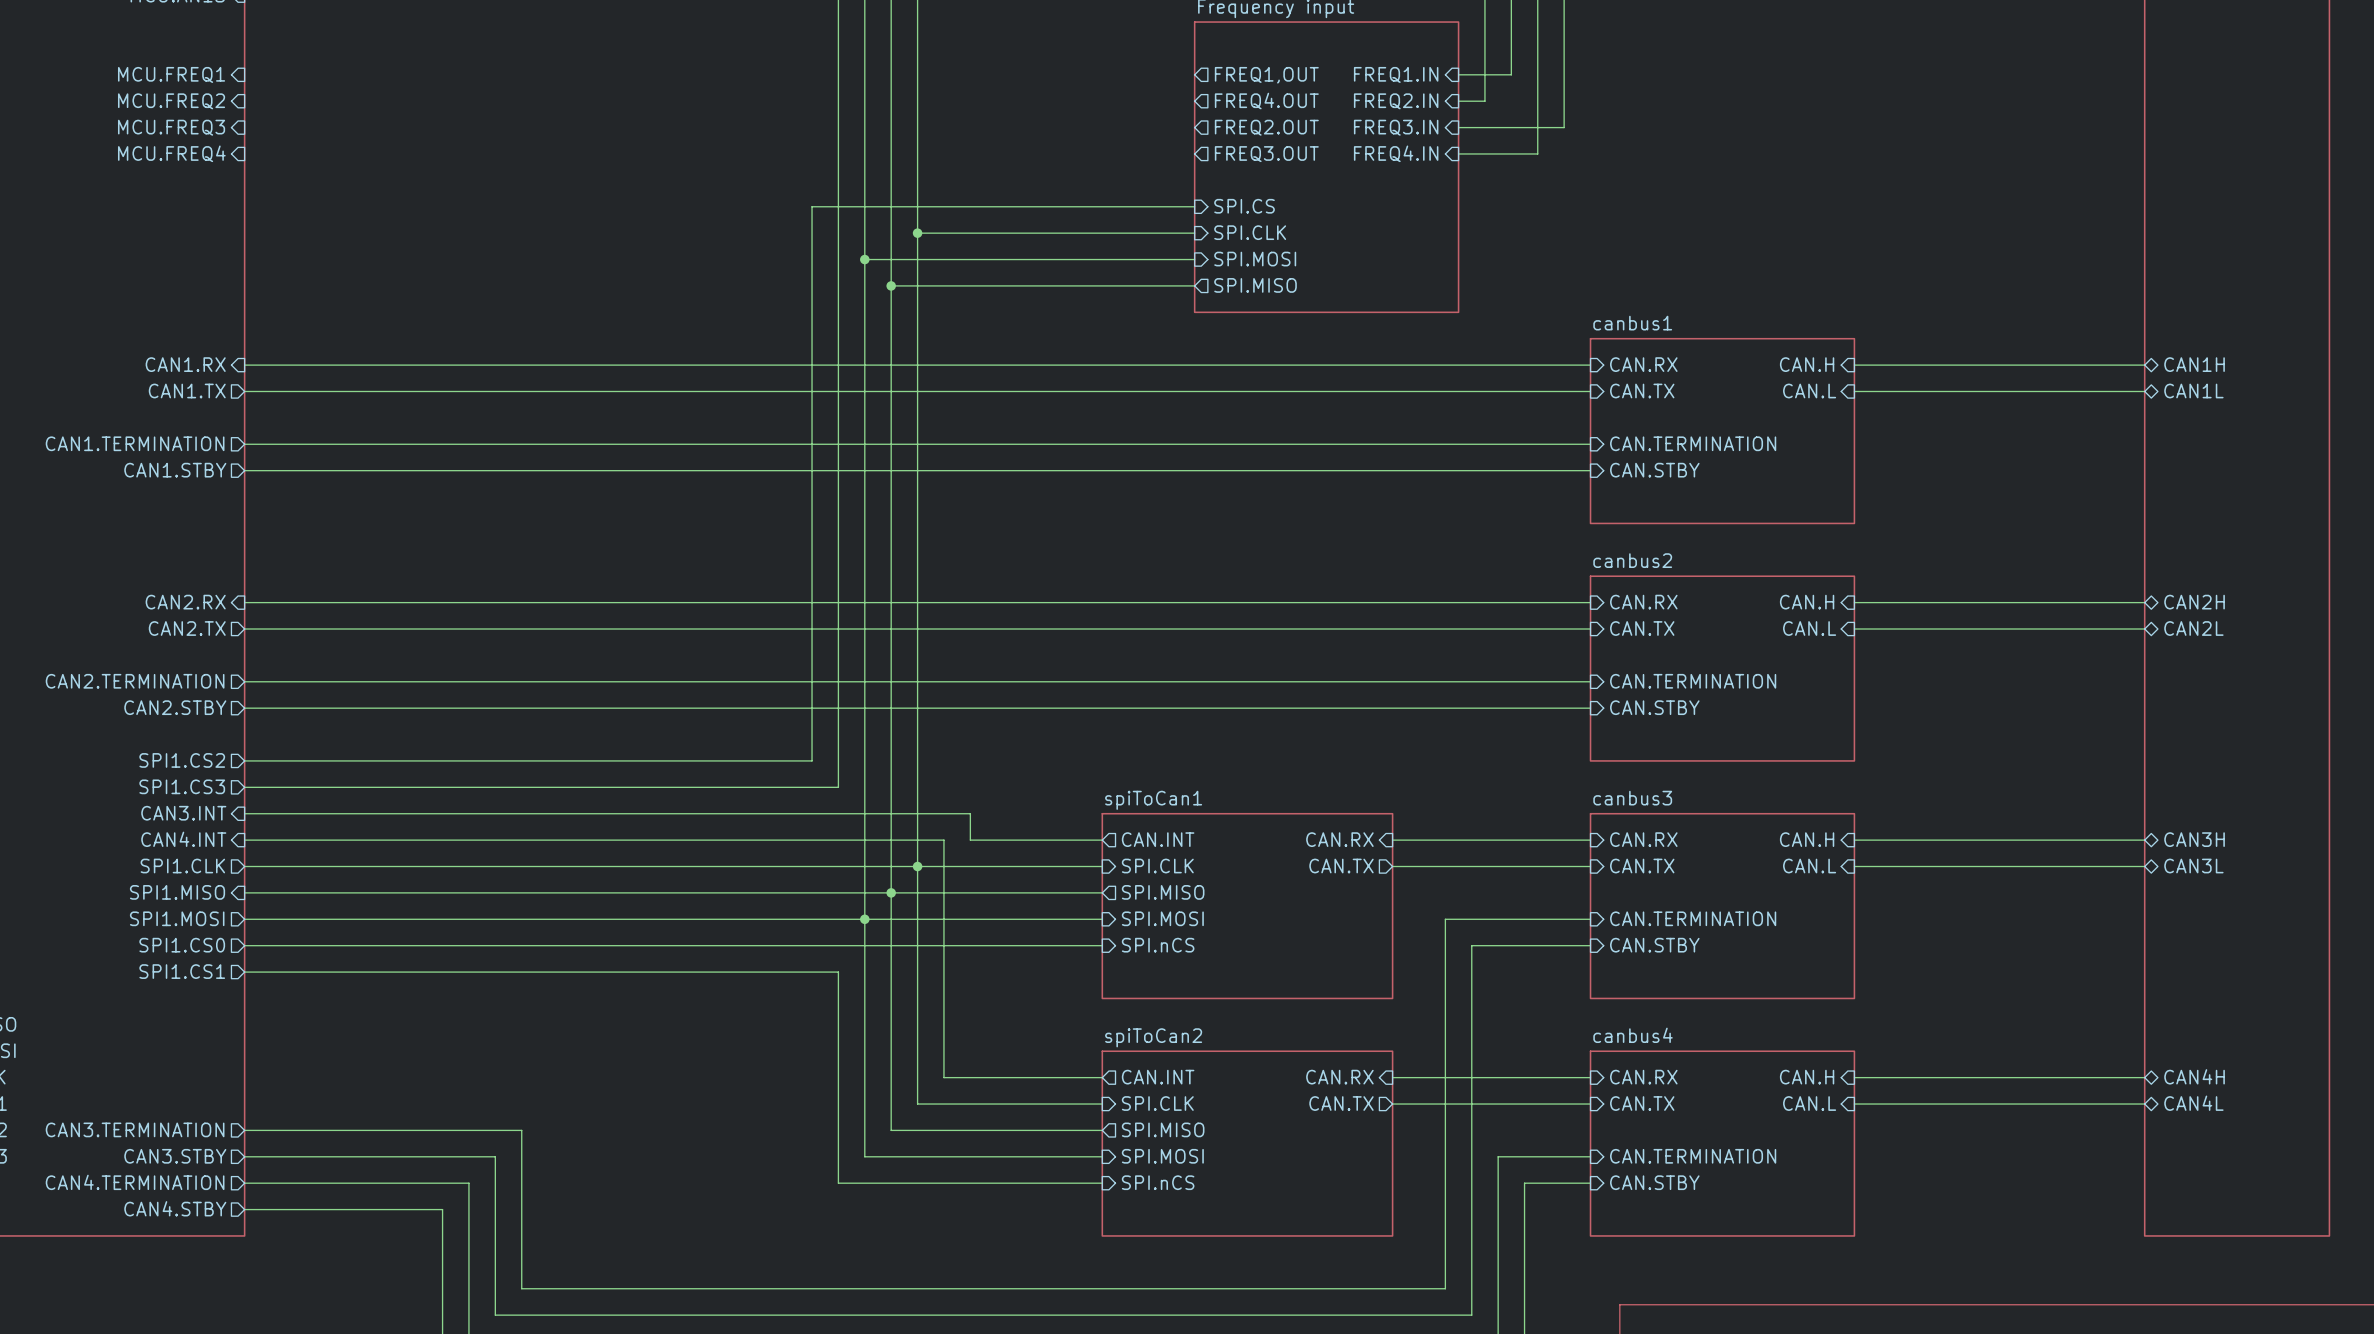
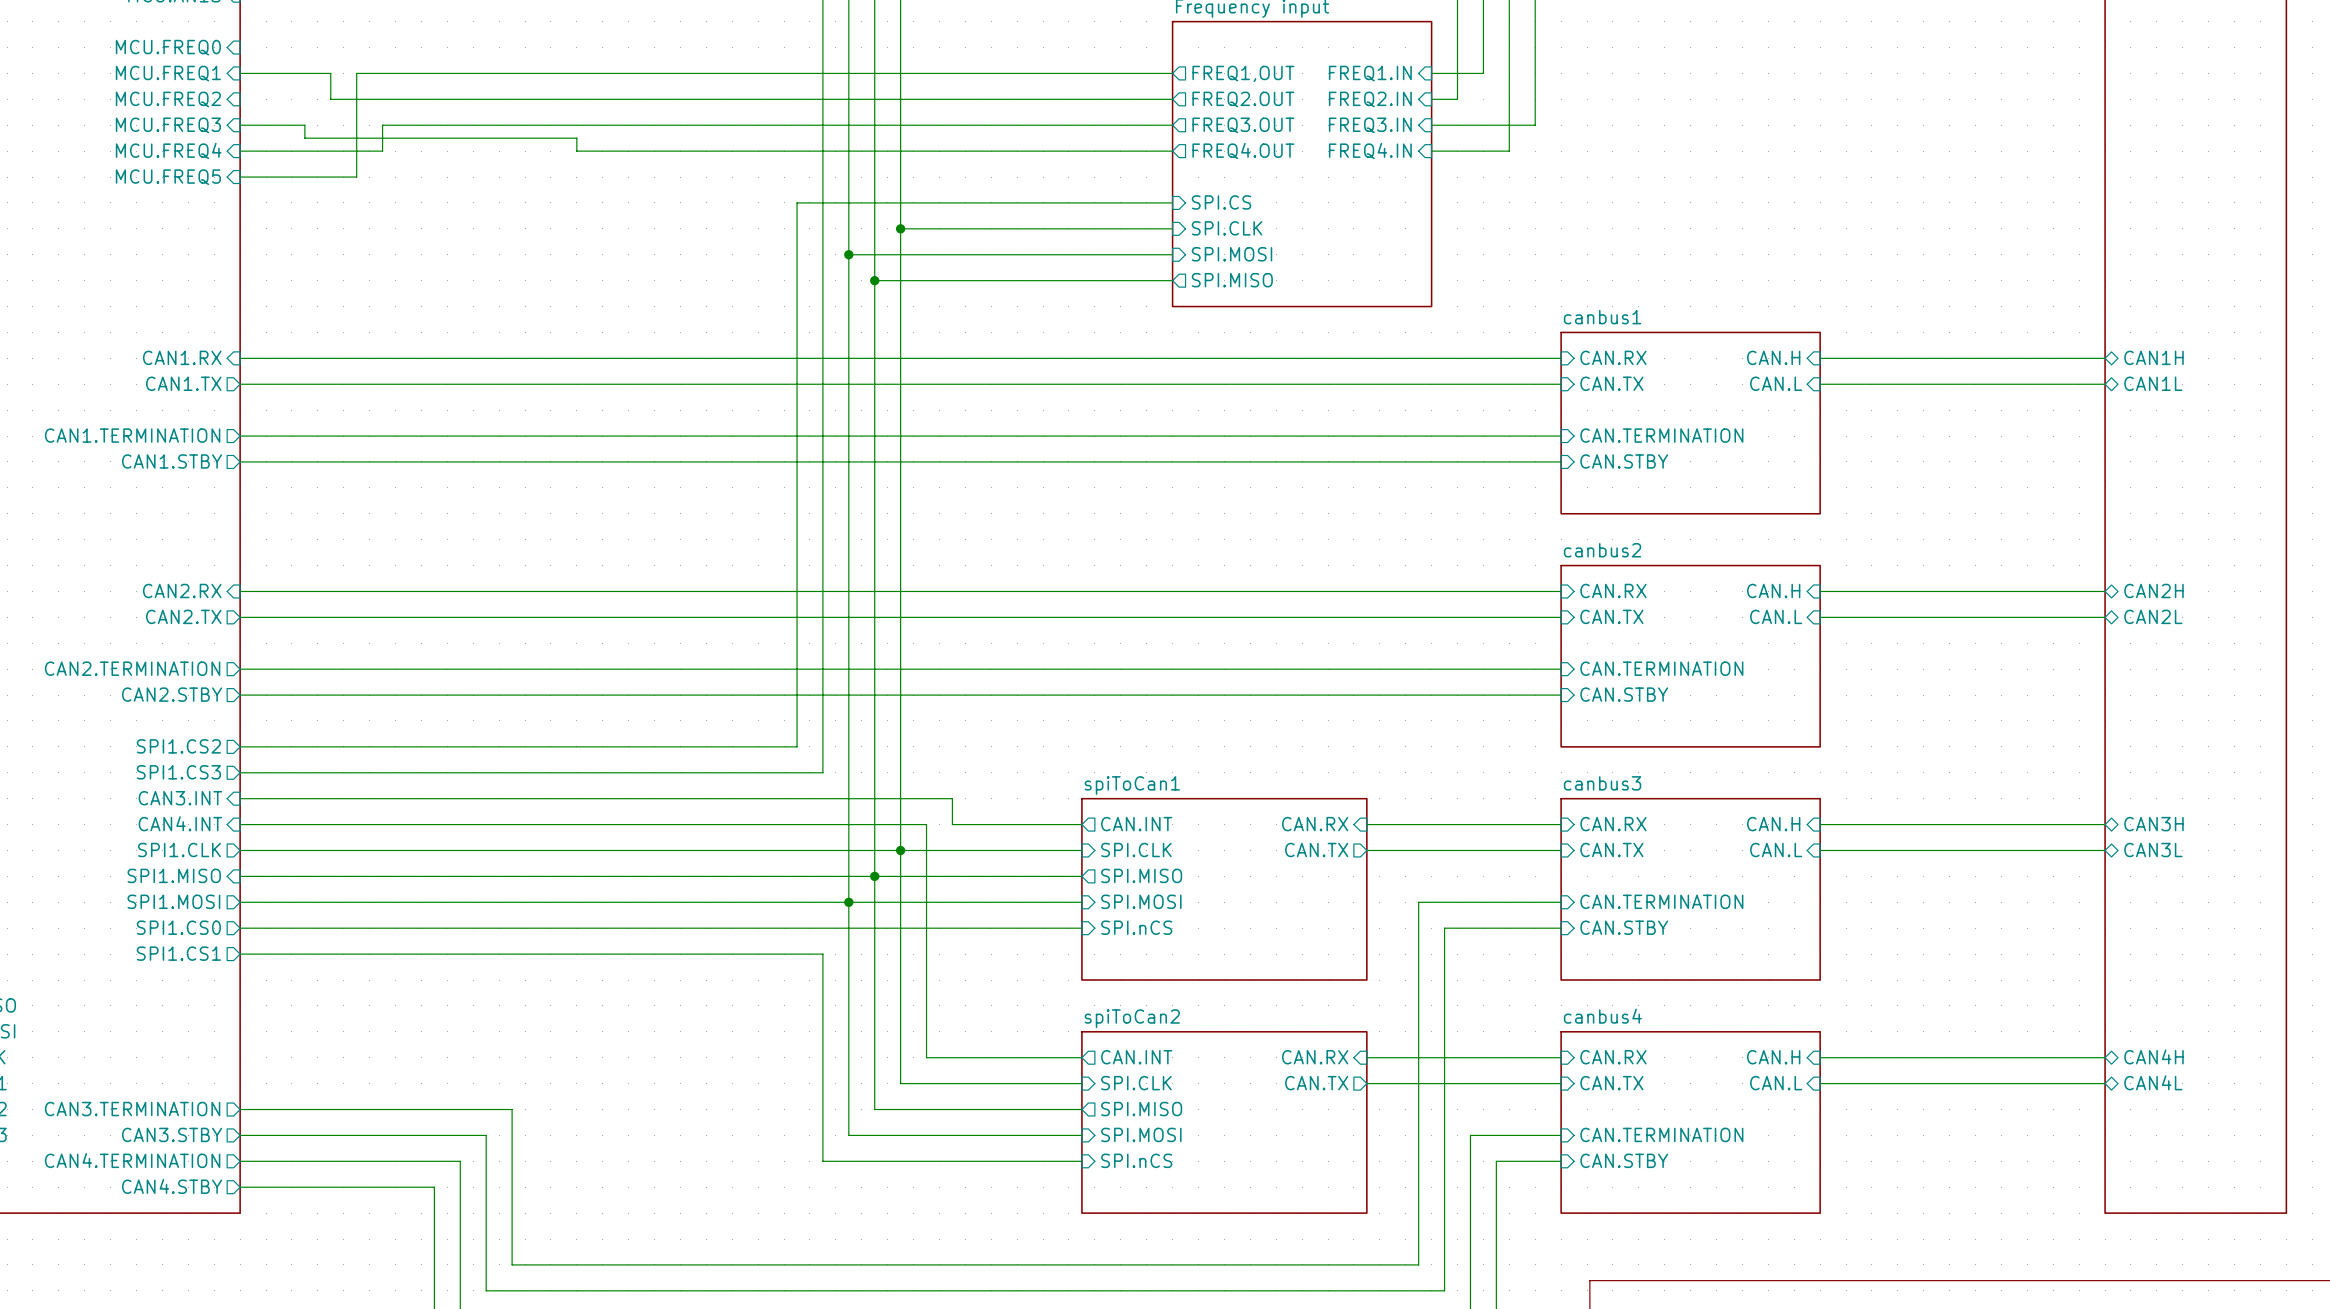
sheet pin: none -> MCU.FREQ0 (168, 47)
wire: none -> (240, 73) (330, 73) (330, 99) (1172, 99)
wire: none -> (1172, 73) (356, 73) (356, 177) (240, 177)
sheet pin: FREQ4.OUT (1266, 101) -> FREQ2.OUT (1243, 99)
wire: none -> (240, 125) (304, 125) (304, 138) (576, 138) (576, 151) (1172, 151)
wire: none -> (1172, 125) (382, 125) (382, 151) (240, 151)
sheet pin: FREQ2.OUT (1266, 127) -> FREQ3.OUT (1243, 125)
sheet pin: FREQ3.OUT (1266, 154) -> FREQ4.OUT (1243, 150)
sheet pin: none -> MCU.FREQ5 (168, 177)

